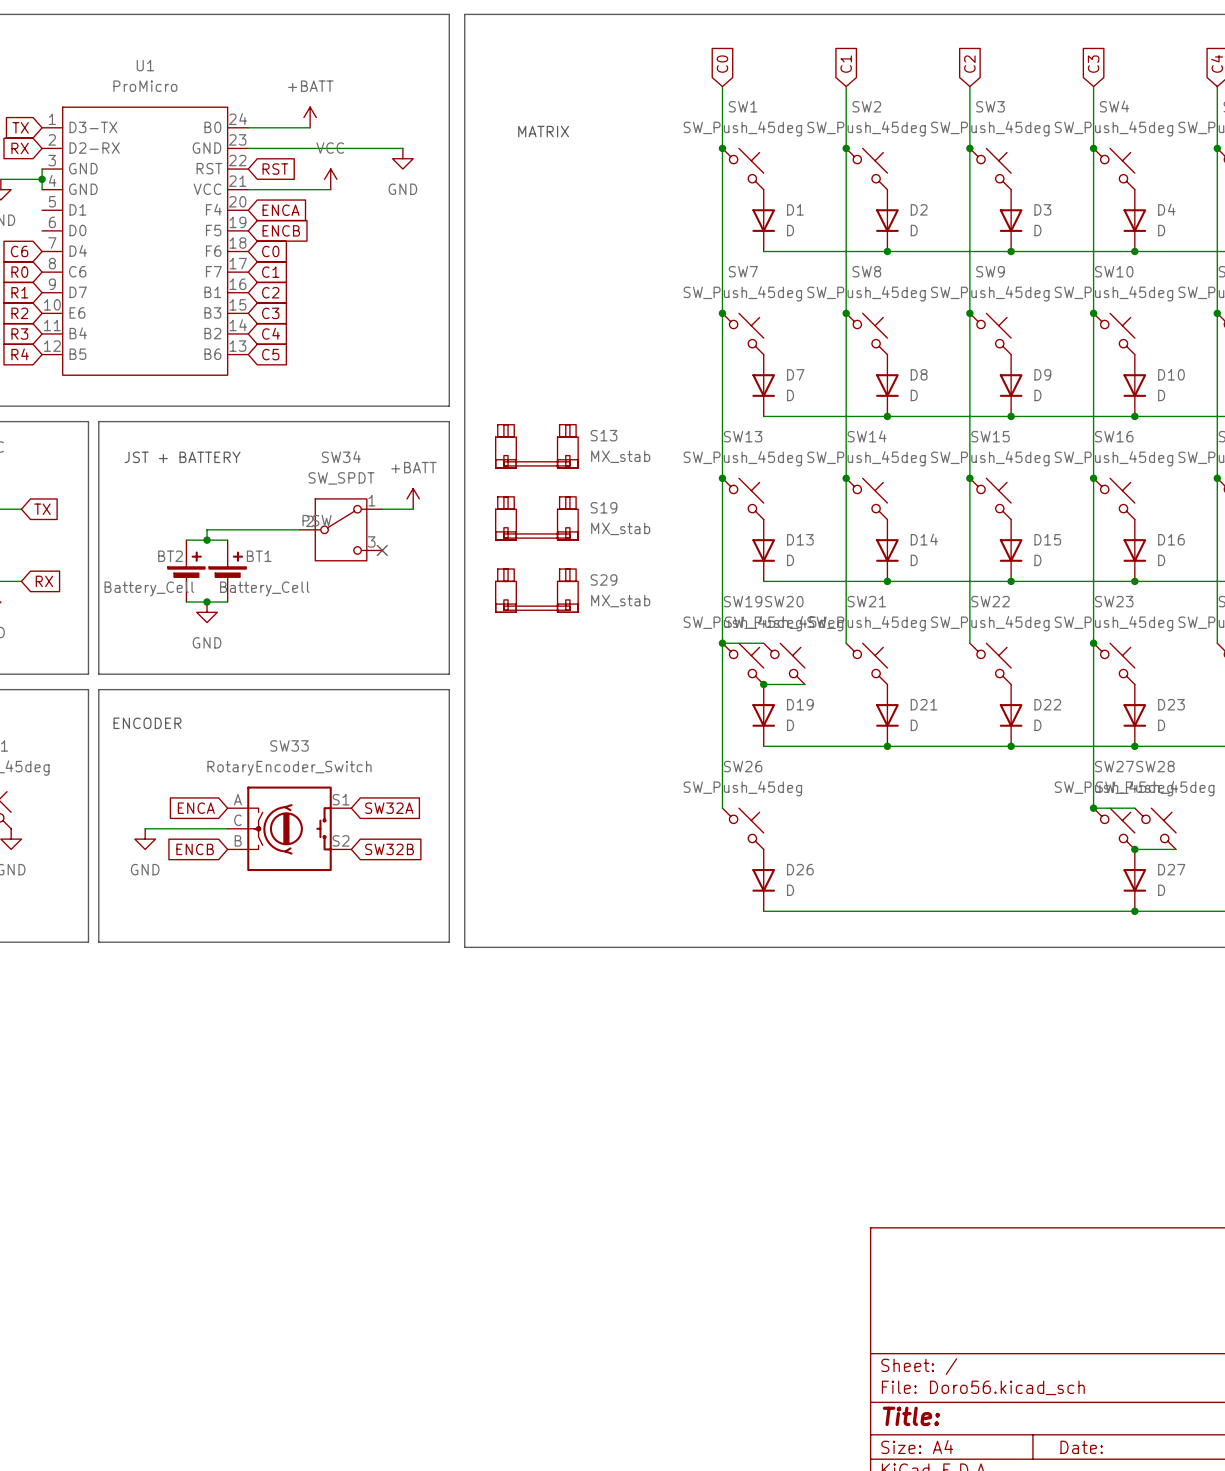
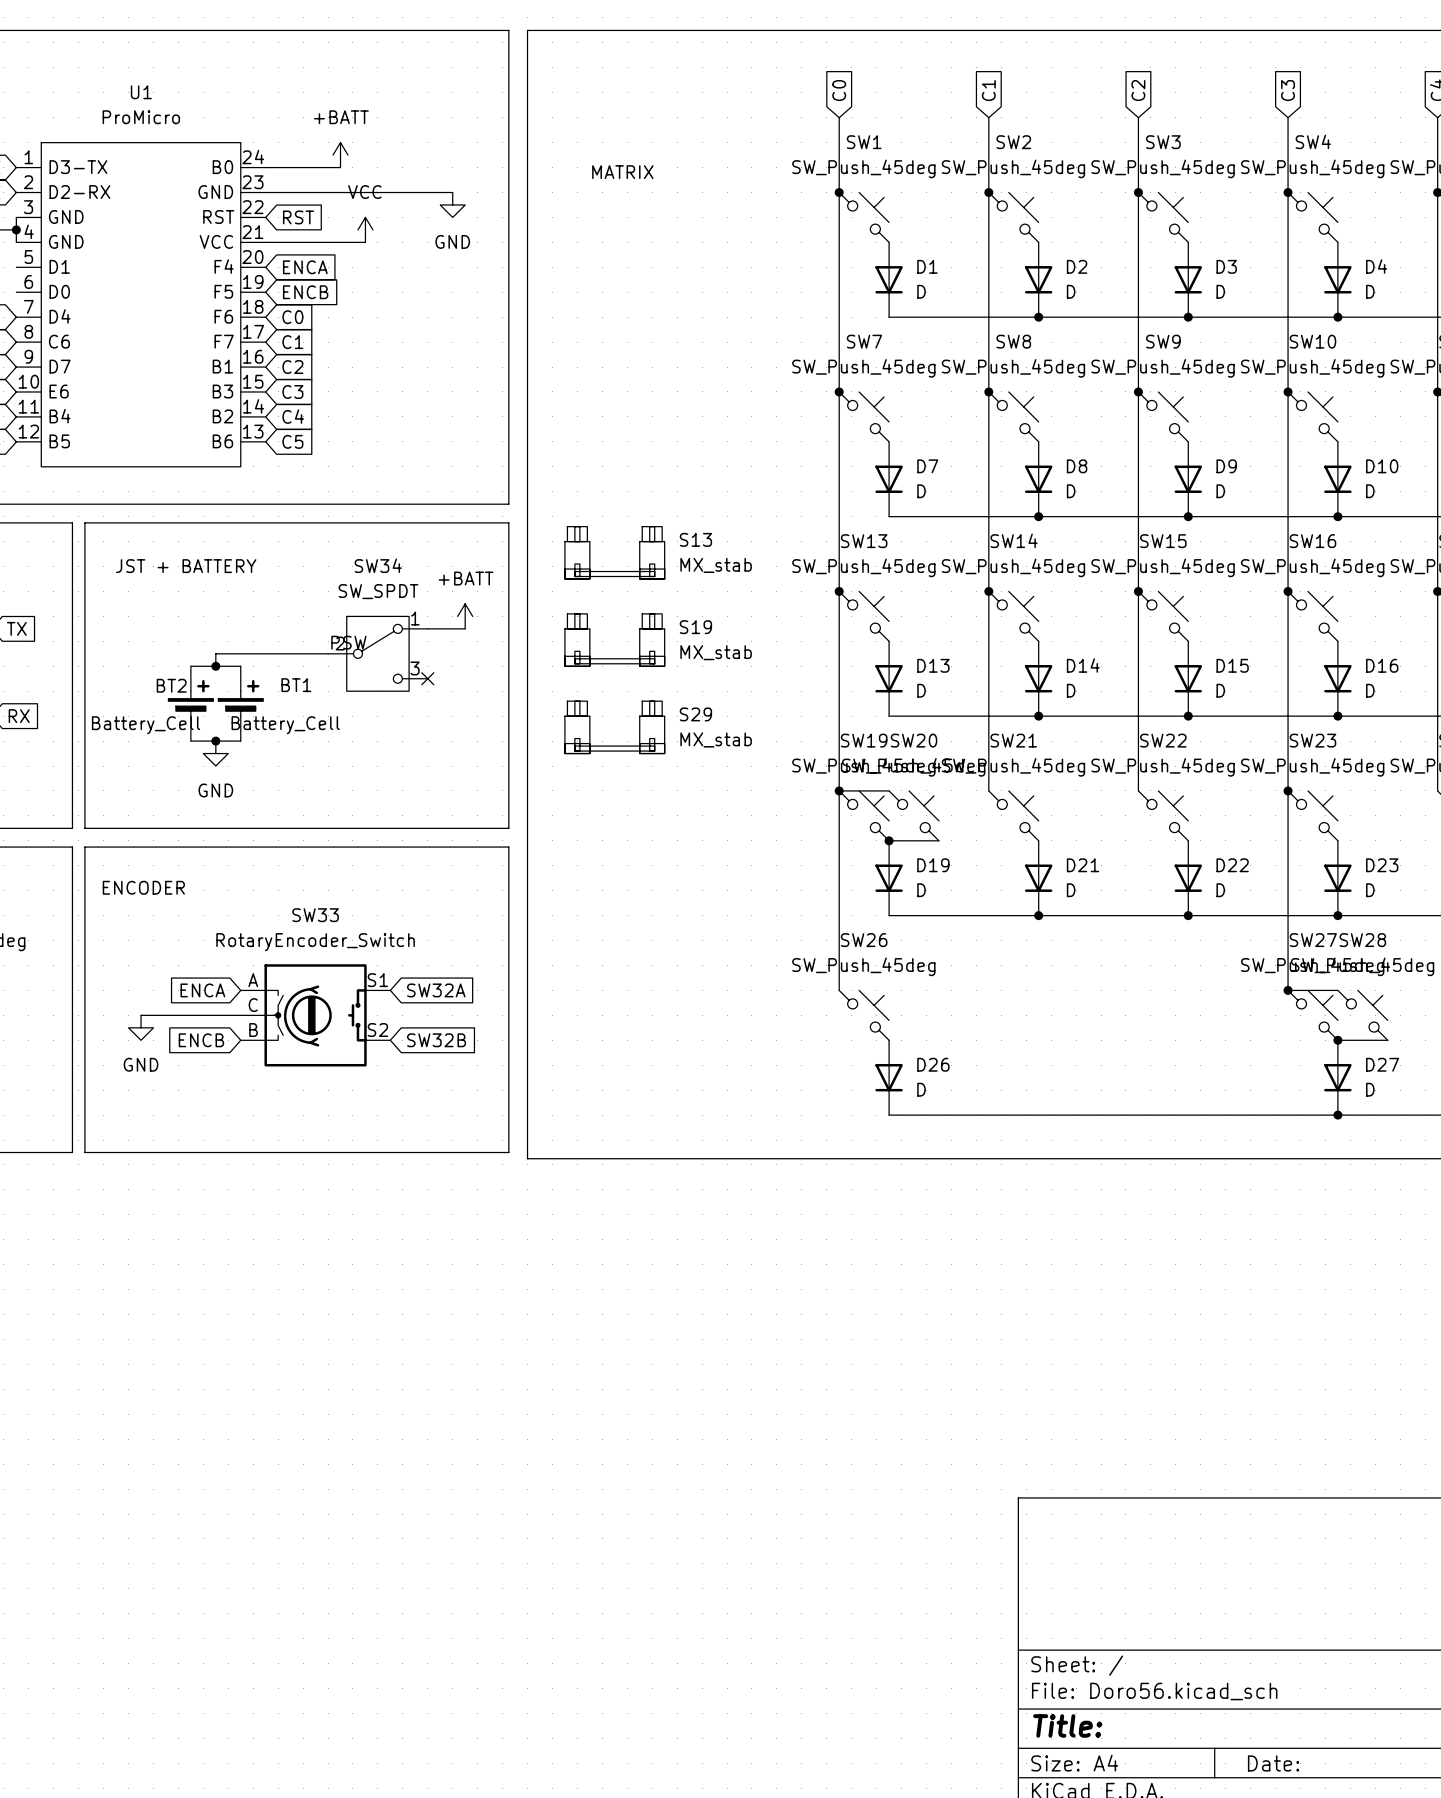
BT1 name position: BT1 (259, 556) -> BT1 (296, 685)

